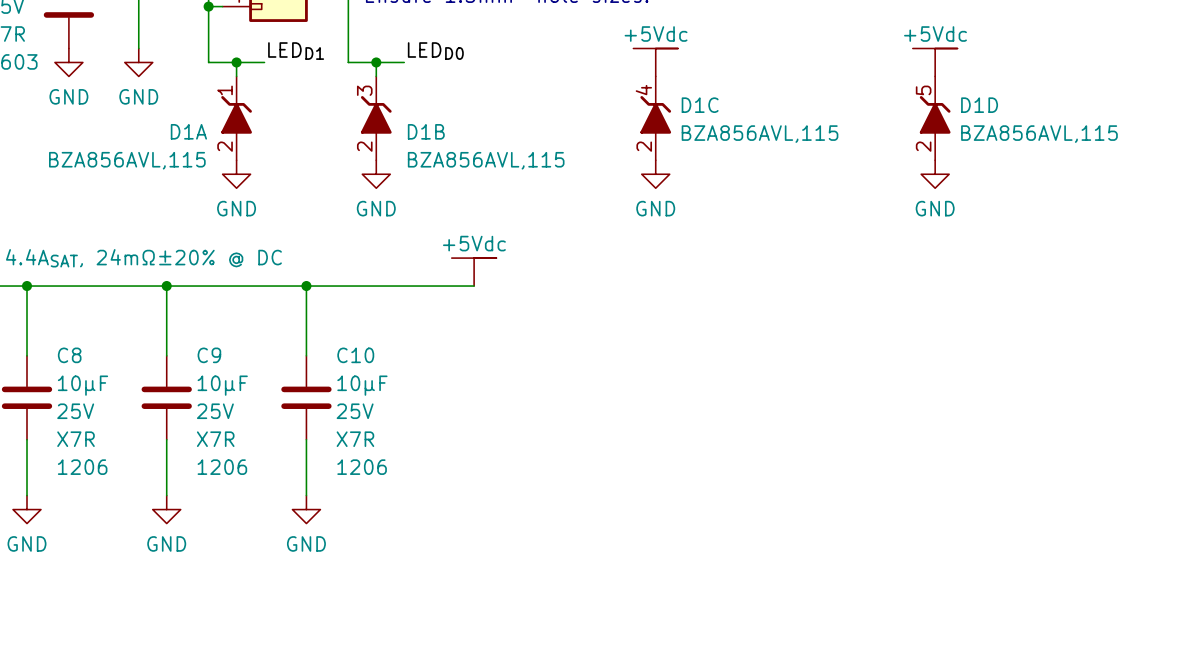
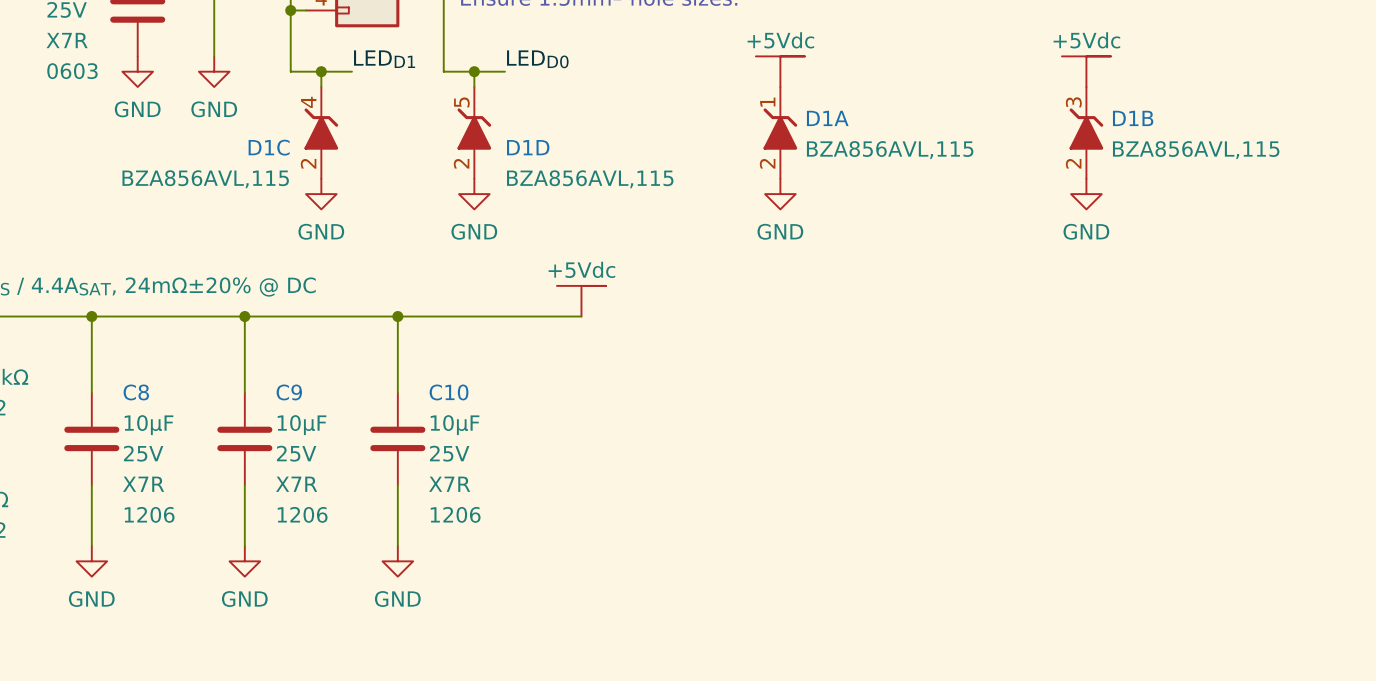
D1C name position: D1C (700, 105) -> D1C (269, 147)
D1D name position: D1D (979, 105) -> D1D (528, 147)
D1A position: (236, 118) -> (780, 132)
D1B position: (376, 118) -> (1086, 132)
D1C position: (655, 118) -> (321, 132)
D1D position: (935, 118) -> (474, 132)
D1A name position: D1A (188, 131) -> D1A (827, 118)
D1B name position: D1B (426, 131) -> D1B (1133, 118)

